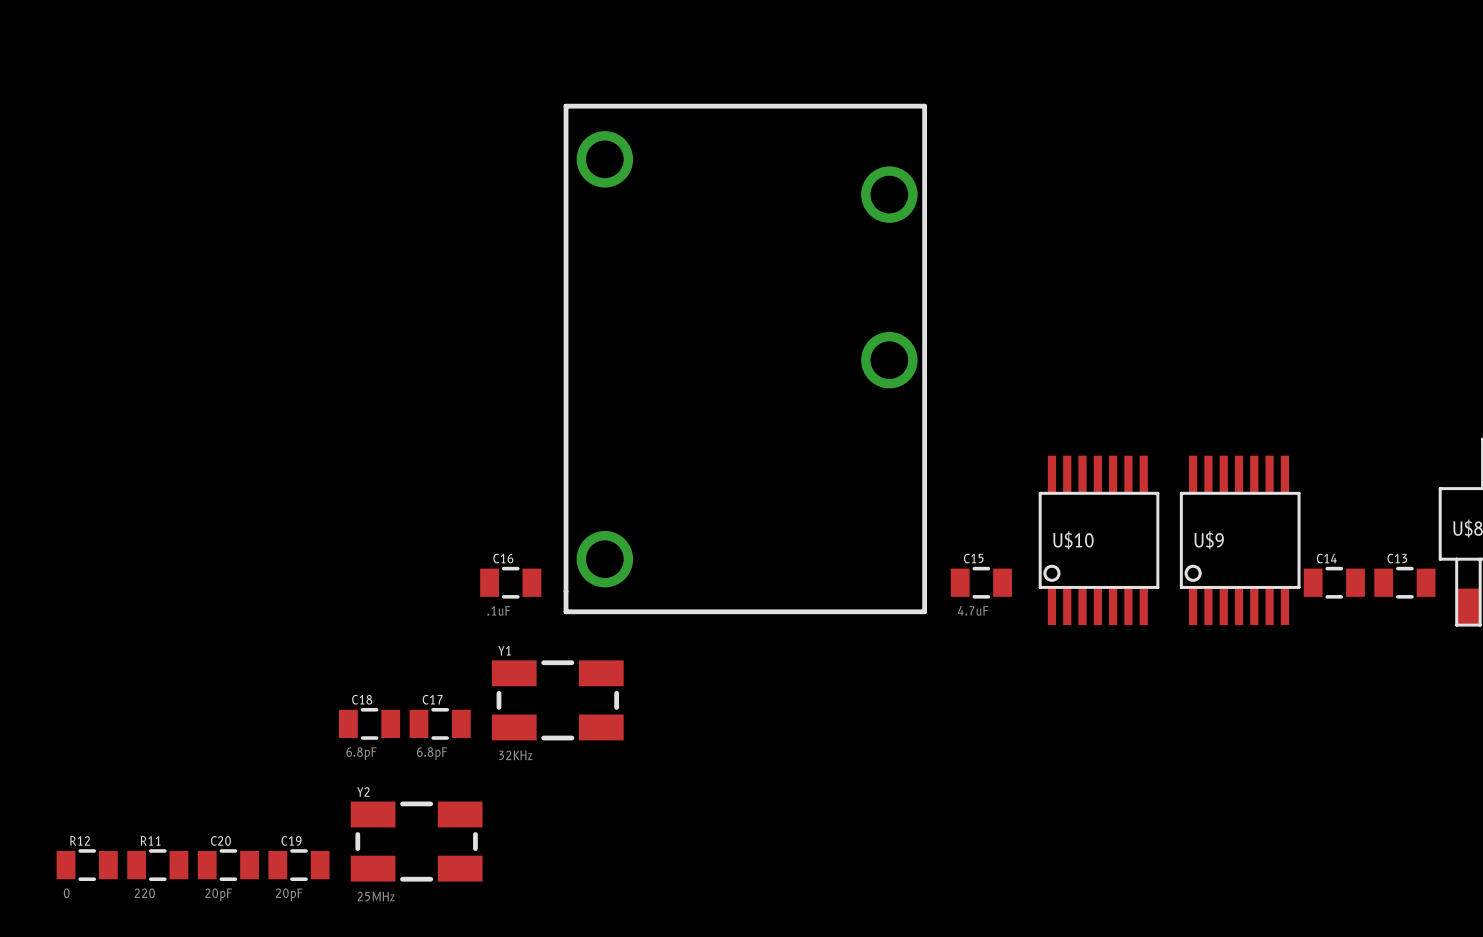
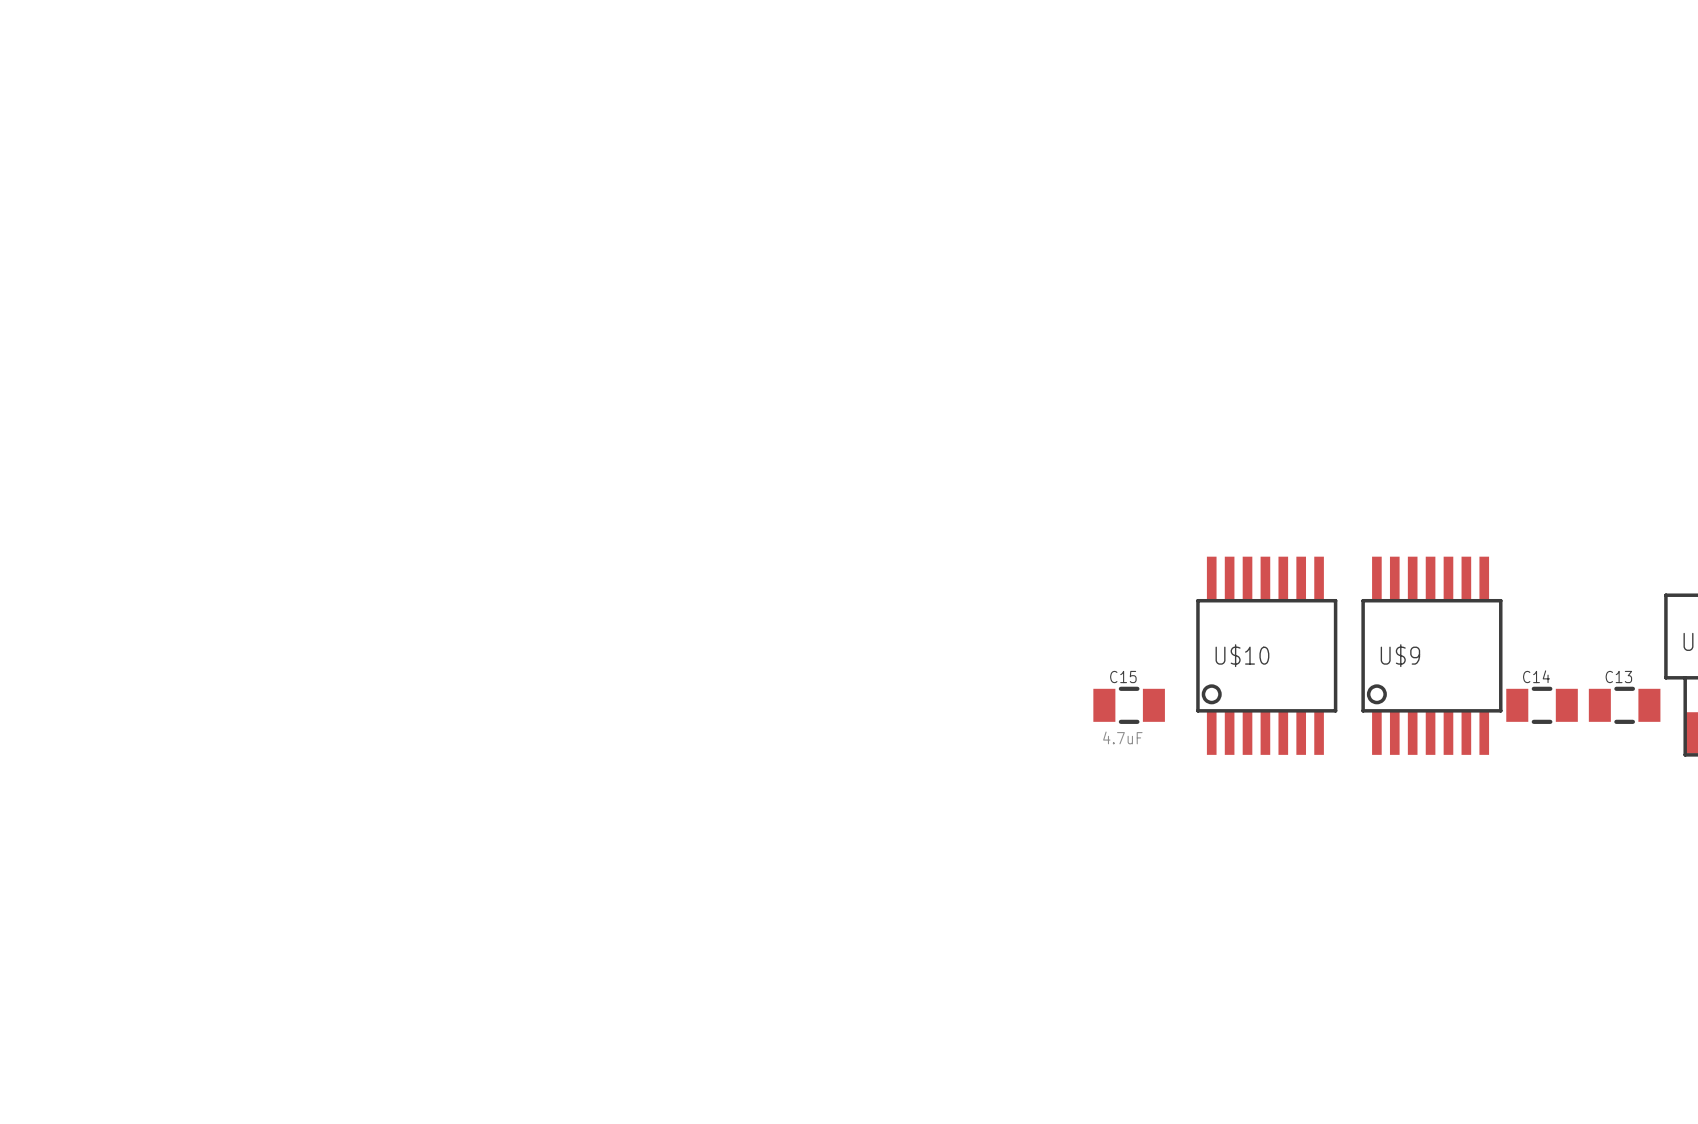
part: (745, 358) -> none
C16: .1uF (510, 582) -> none
Y1: 32KHz (557, 700) -> none
C18: 6.8pF (369, 723) -> none
C17: 6.8pF (440, 723) -> none
Y2: 25MHz (416, 841) -> none
R12: 0 (87, 865) -> none
R11: 220 (157, 865) -> none
C20: 20pF (228, 865) -> none
C19: 20pF (298, 865) -> none

